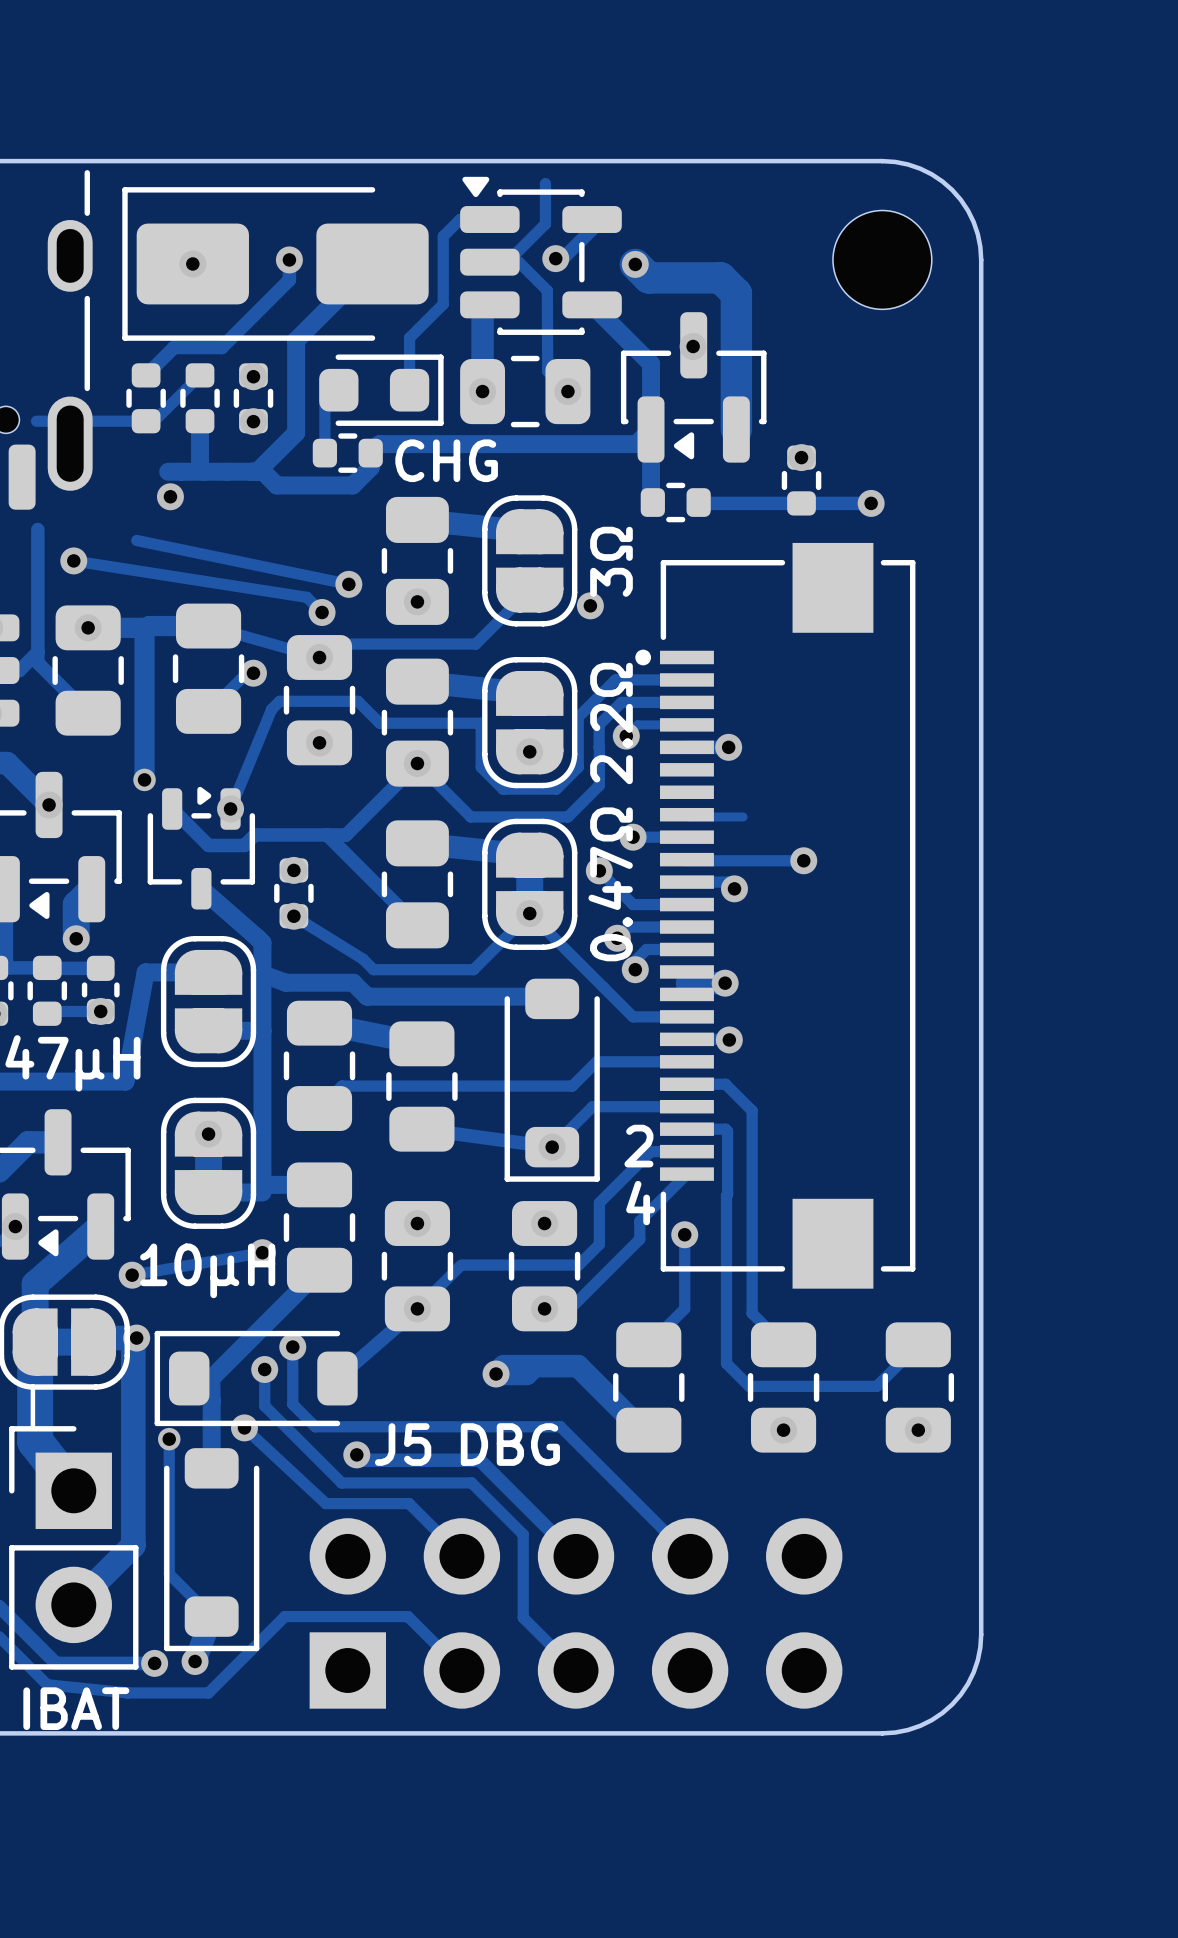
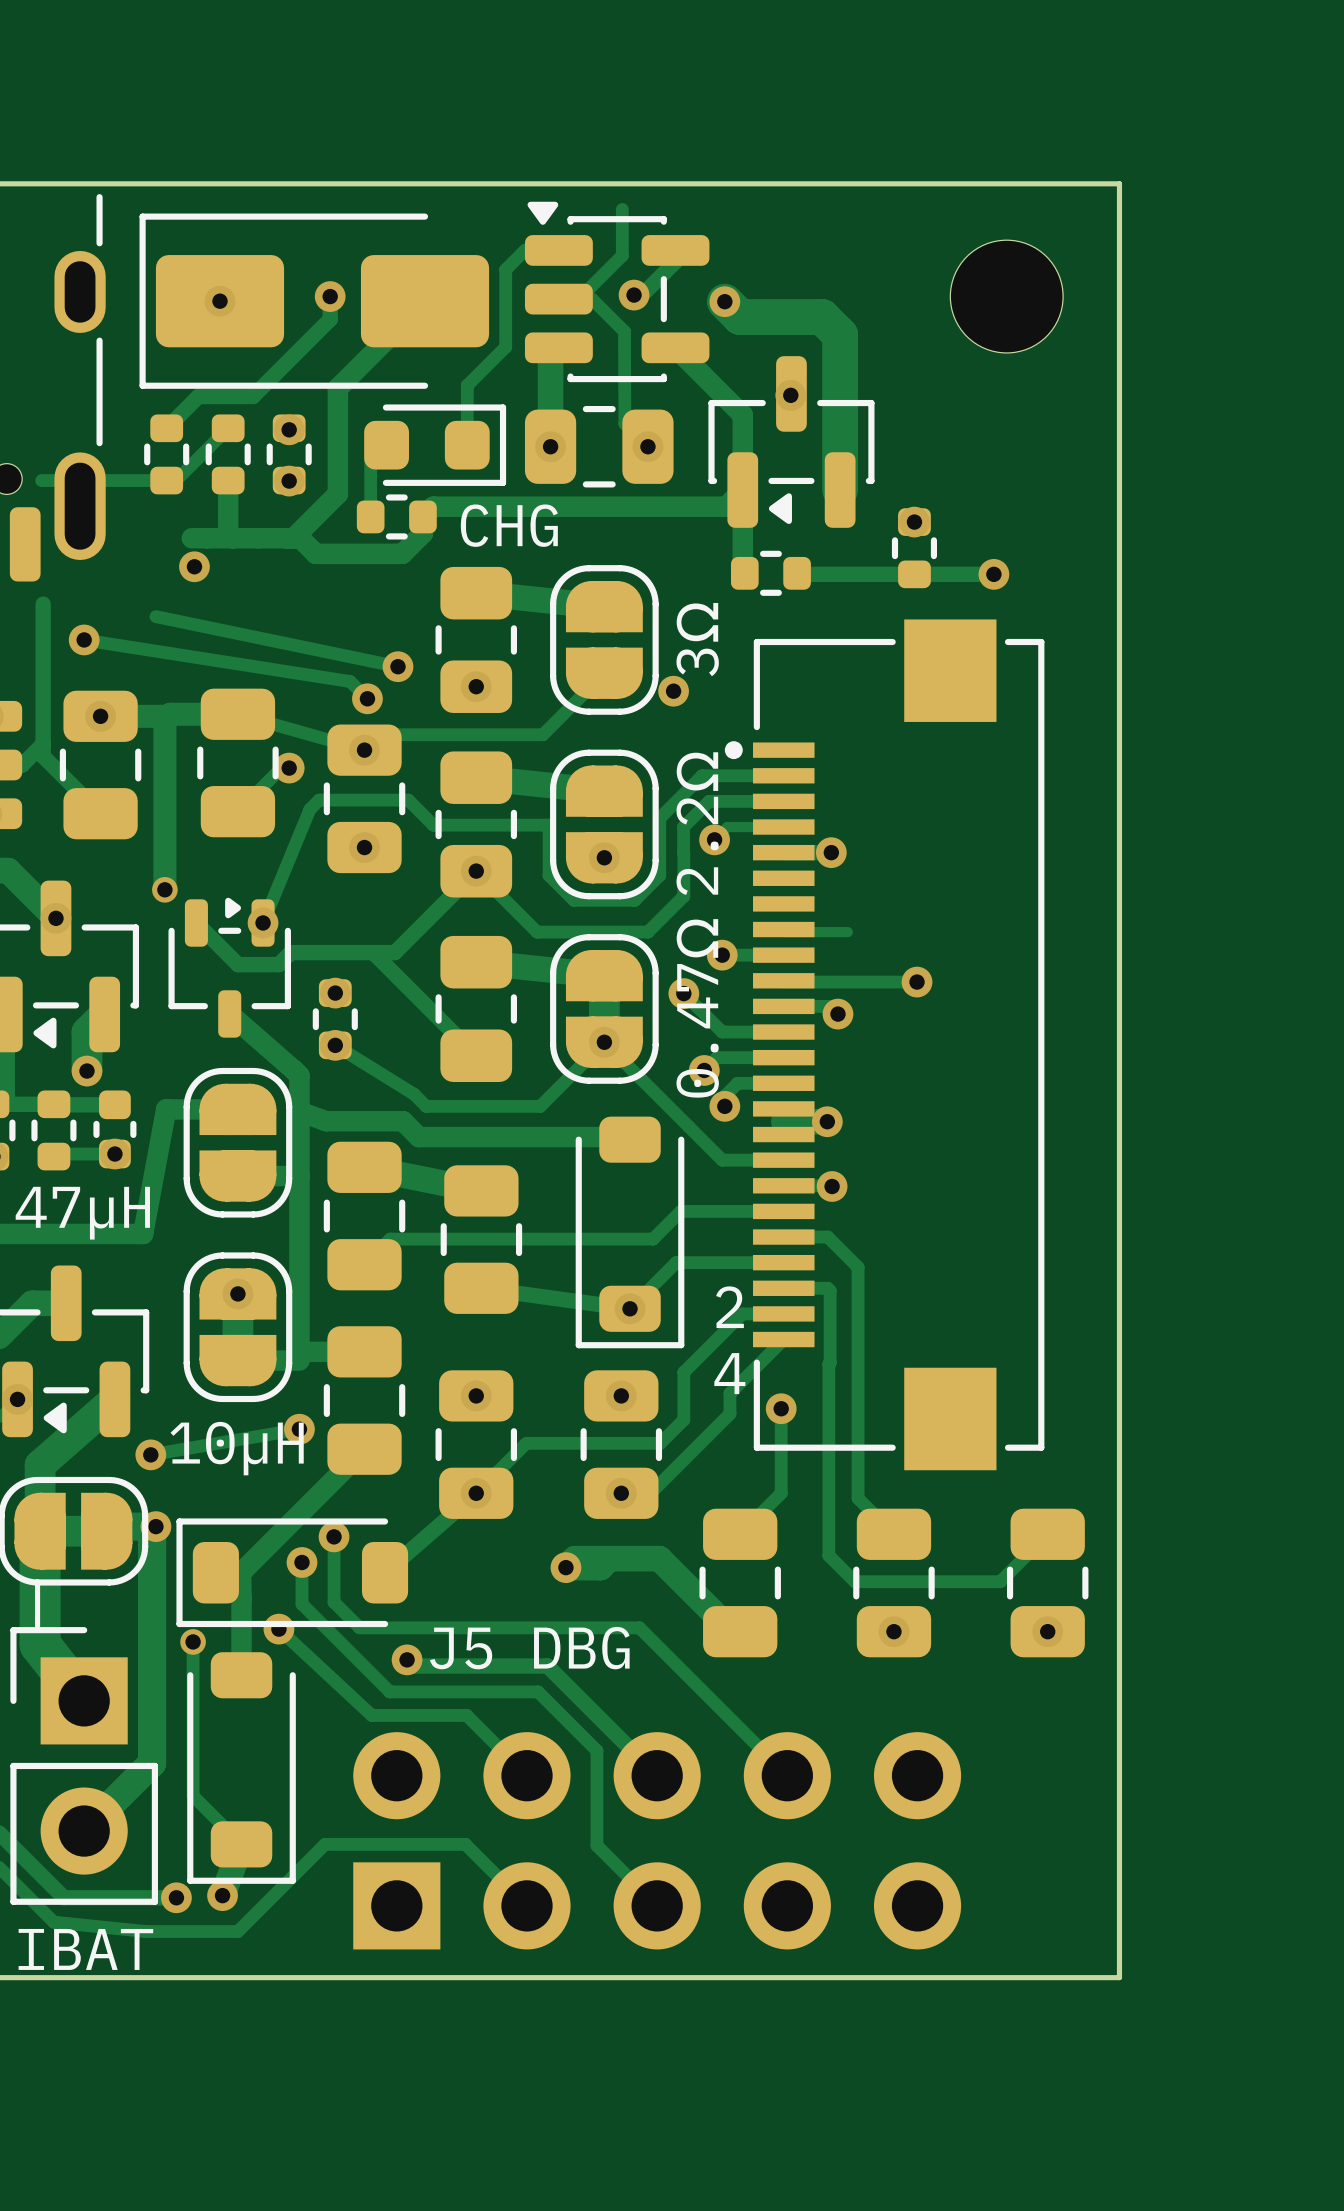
board edge: (882, 161) (895, 161) (920, 168) (931, 174) (952, 190) (960, 199) (973, 222) (977, 234) (981, 259) -> (1006, 183) (1119, 183) (1119, 296)
board edge: (981, 1634) (977, 1660) (973, 1672) (967, 1683) (952, 1704) (931, 1720) (920, 1725) (907, 1730) (882, 1733) -> (1119, 1864) (1119, 1977) (1006, 1977)

